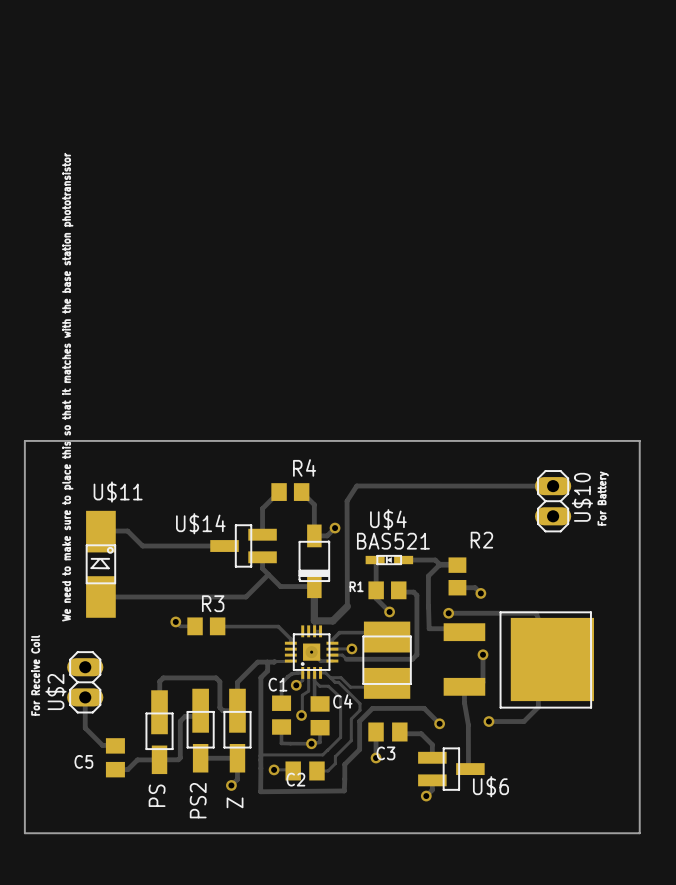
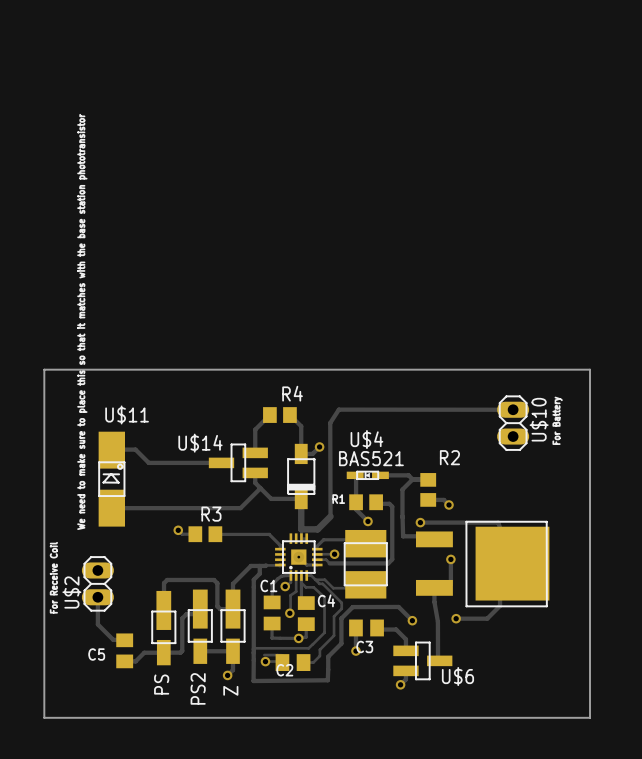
track: none -> (264, 655) (281, 656)

